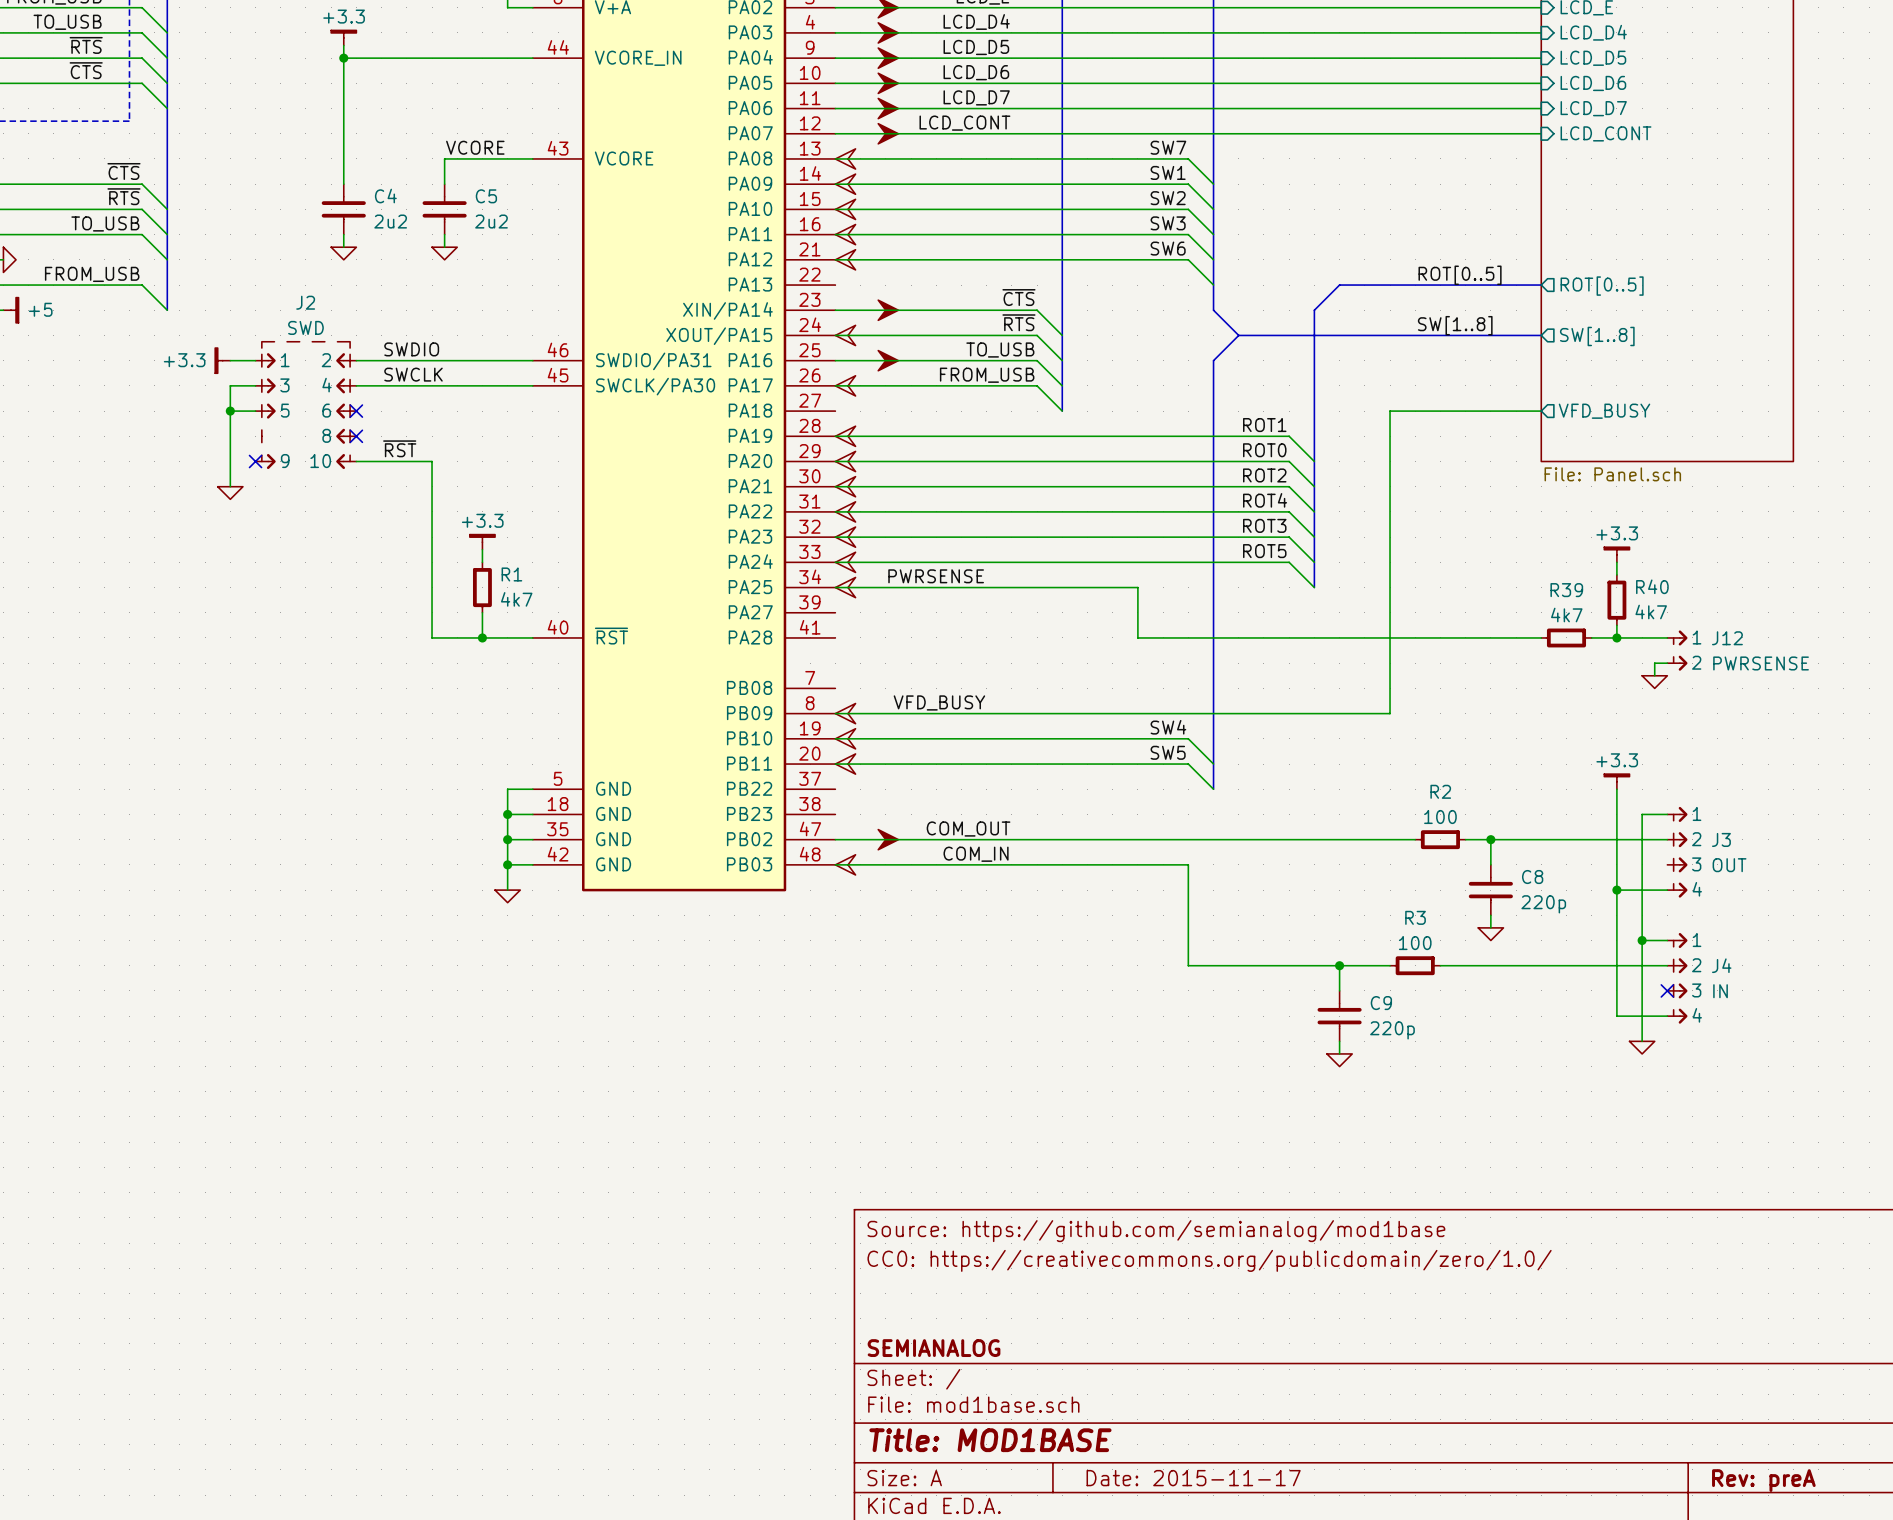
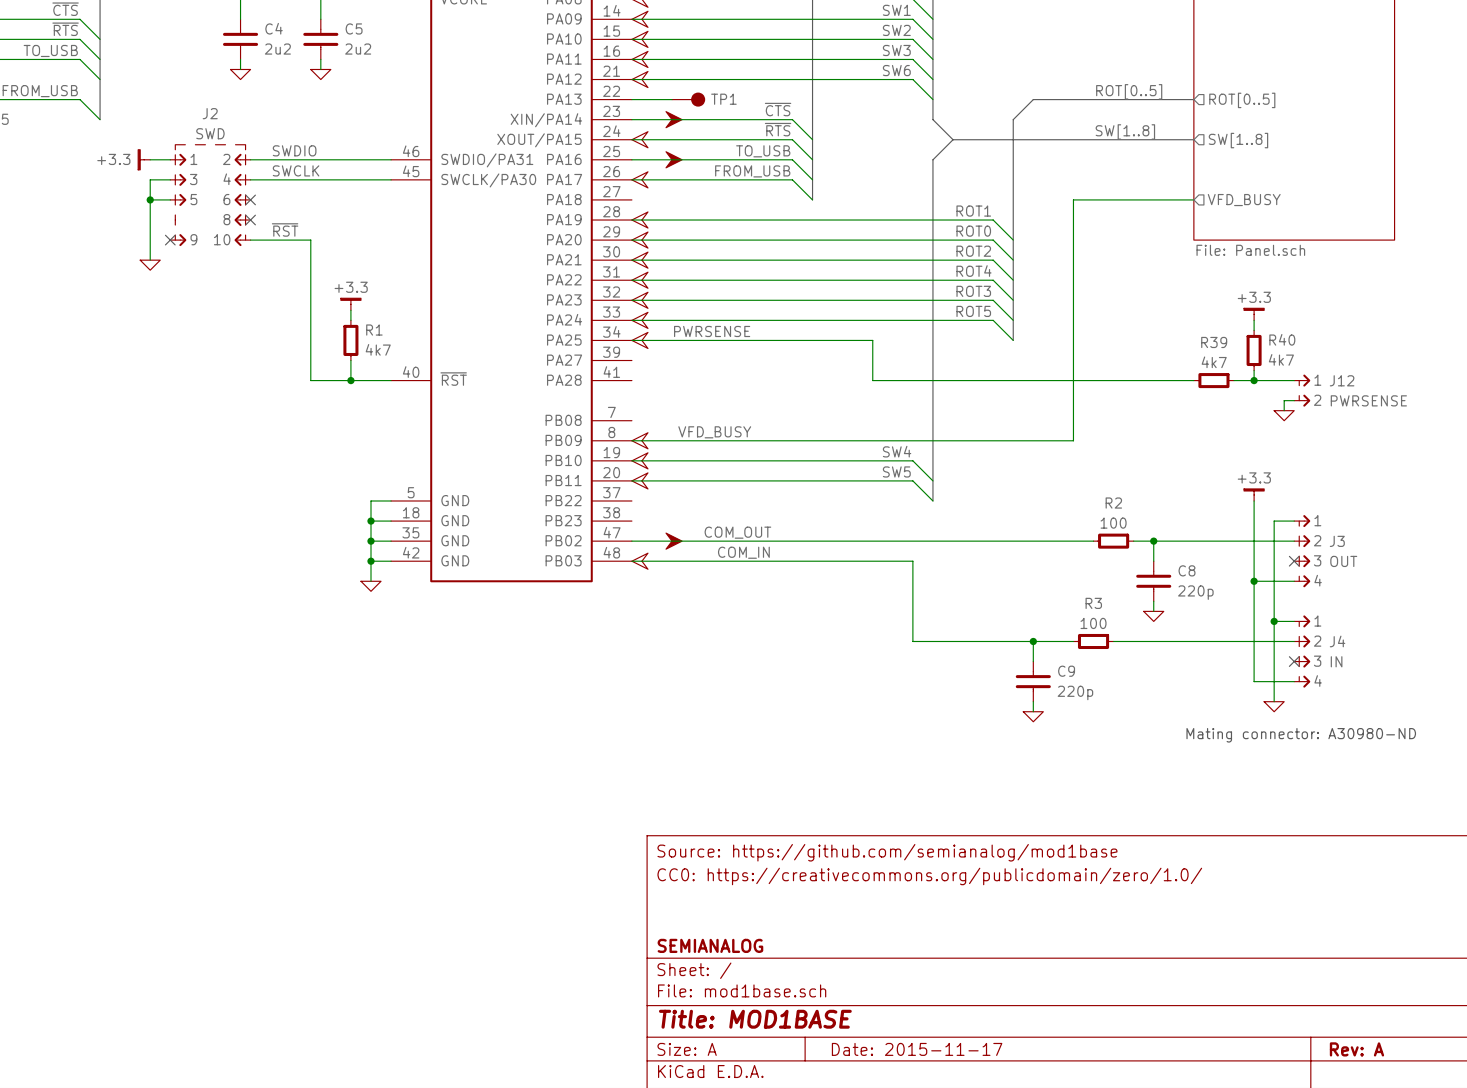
wire: none -> (631, 99) (672, 99)
TP1: none -> (688, 99)
no-connect mark: none -> (1294, 561)
text: none -> Mating connector: A30980-ND (1301, 735)
title block: Rev: preA (1763, 1480) -> Rev: A (1356, 1049)

